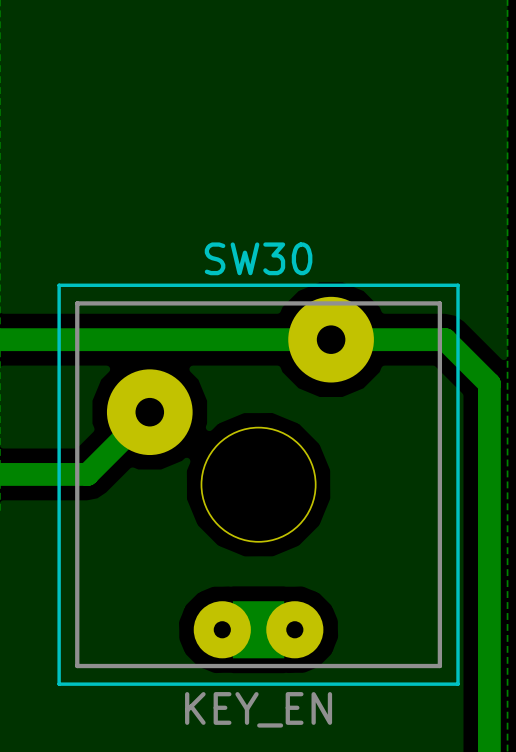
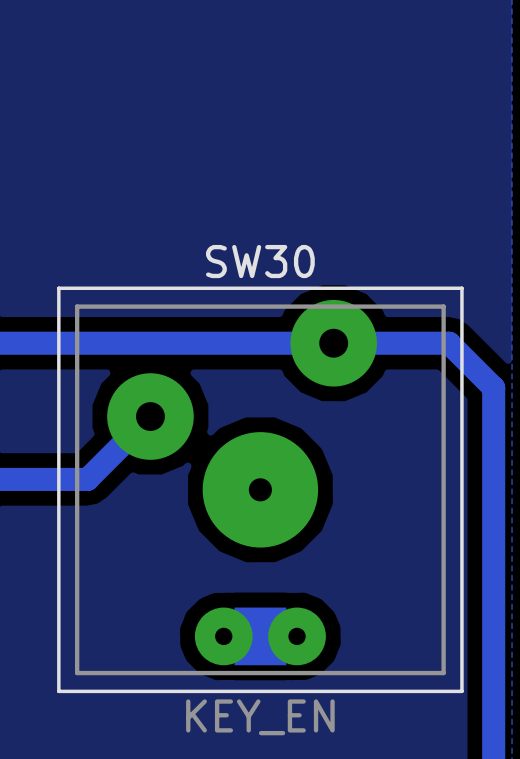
SW30 footprint: [57, 283, 460, 686] -> [57, 286, 464, 694]

